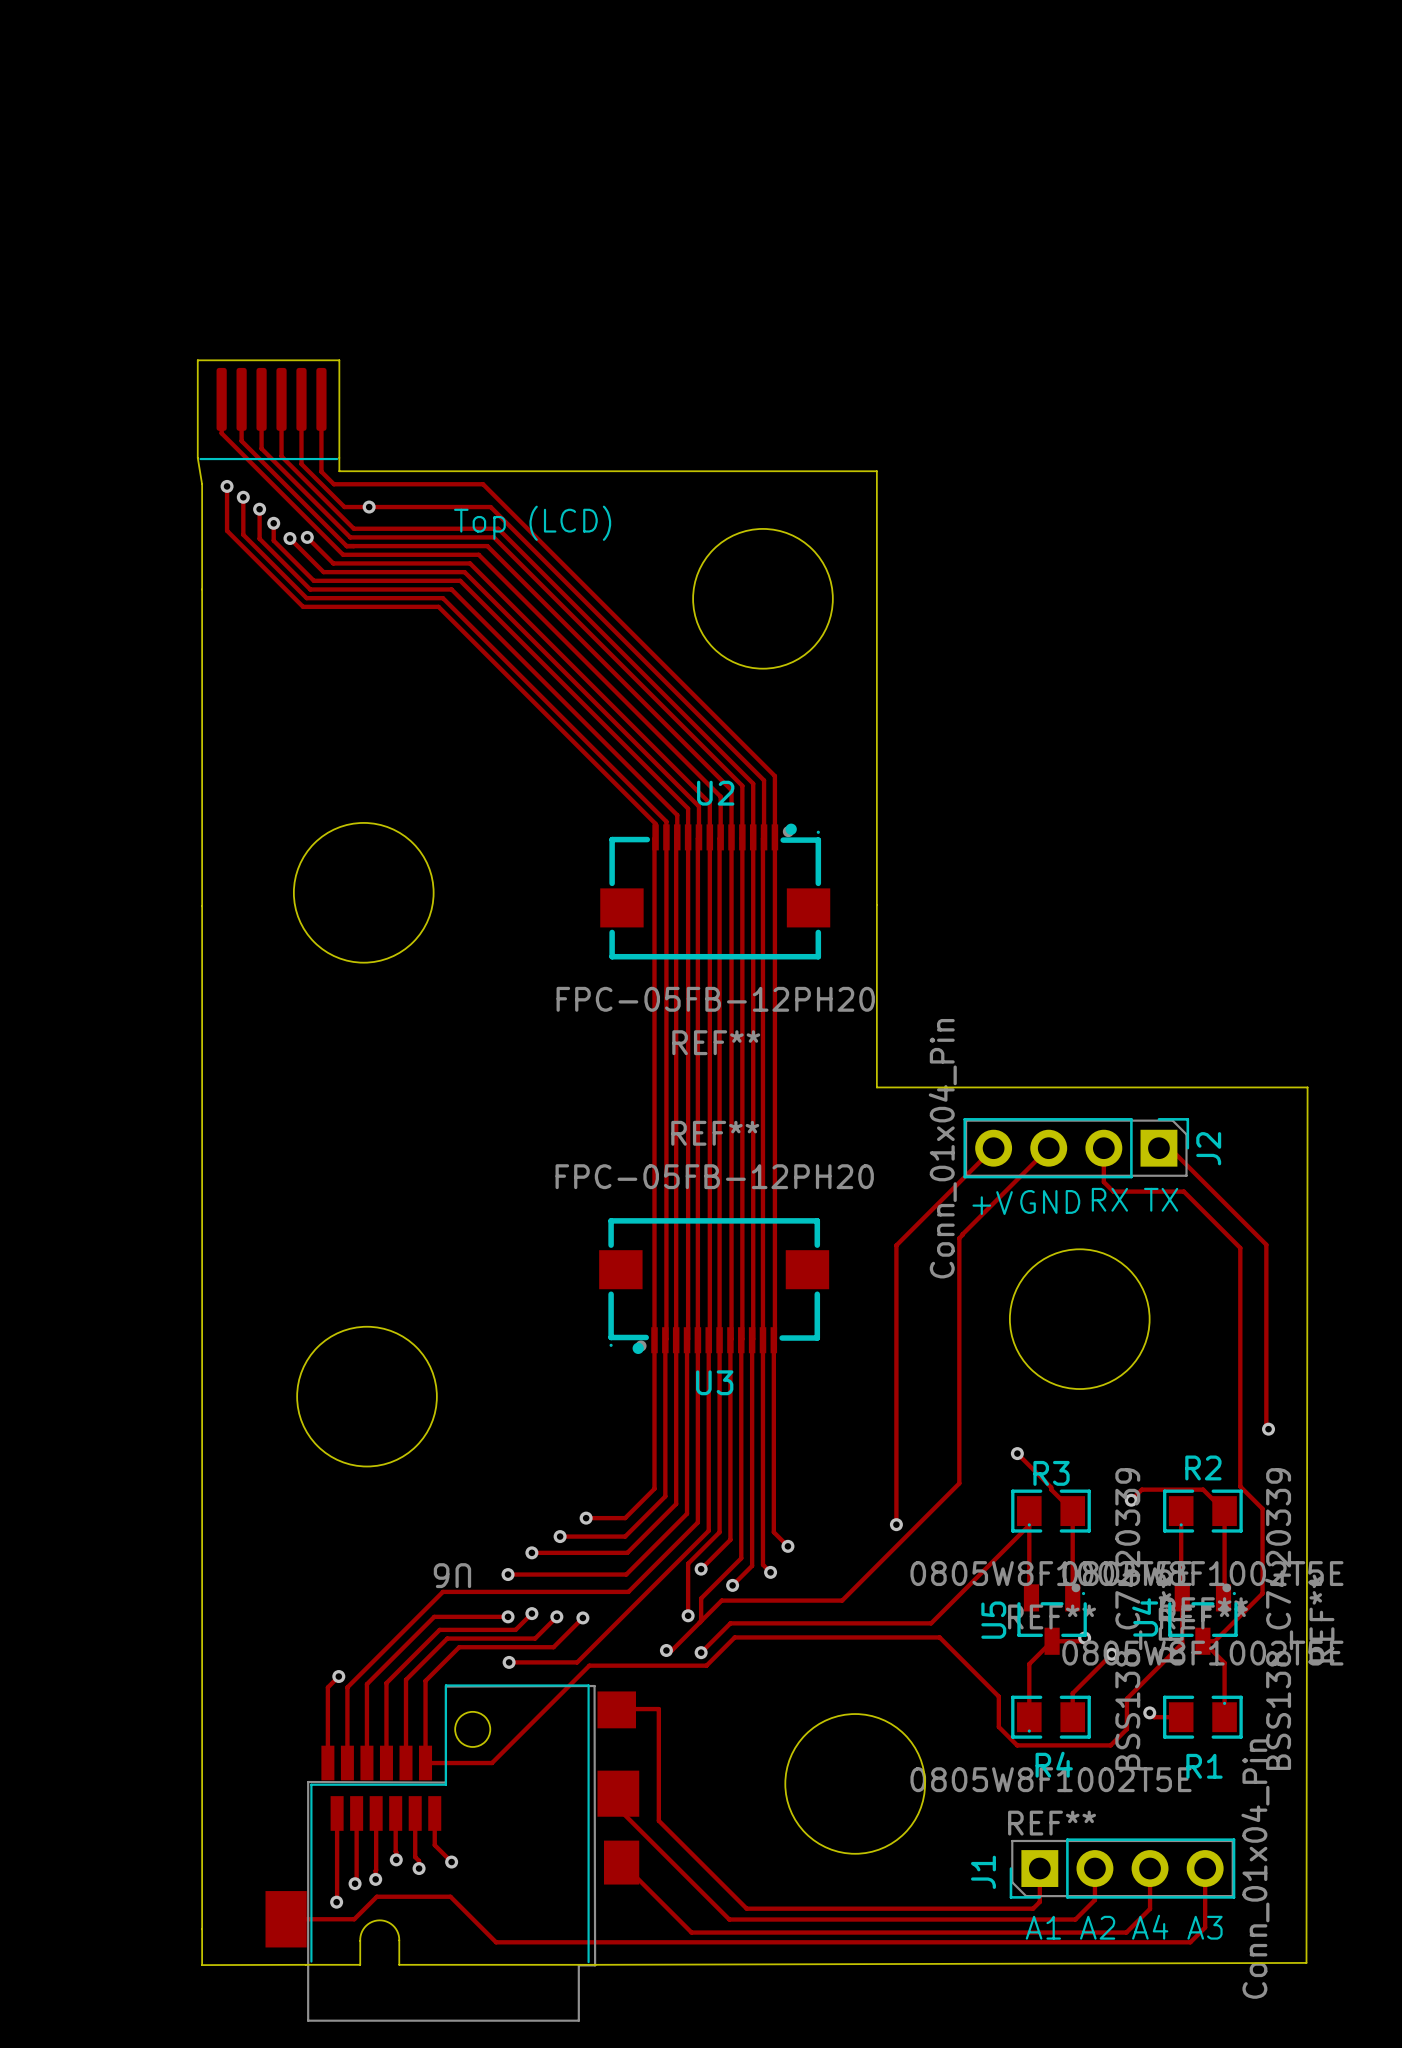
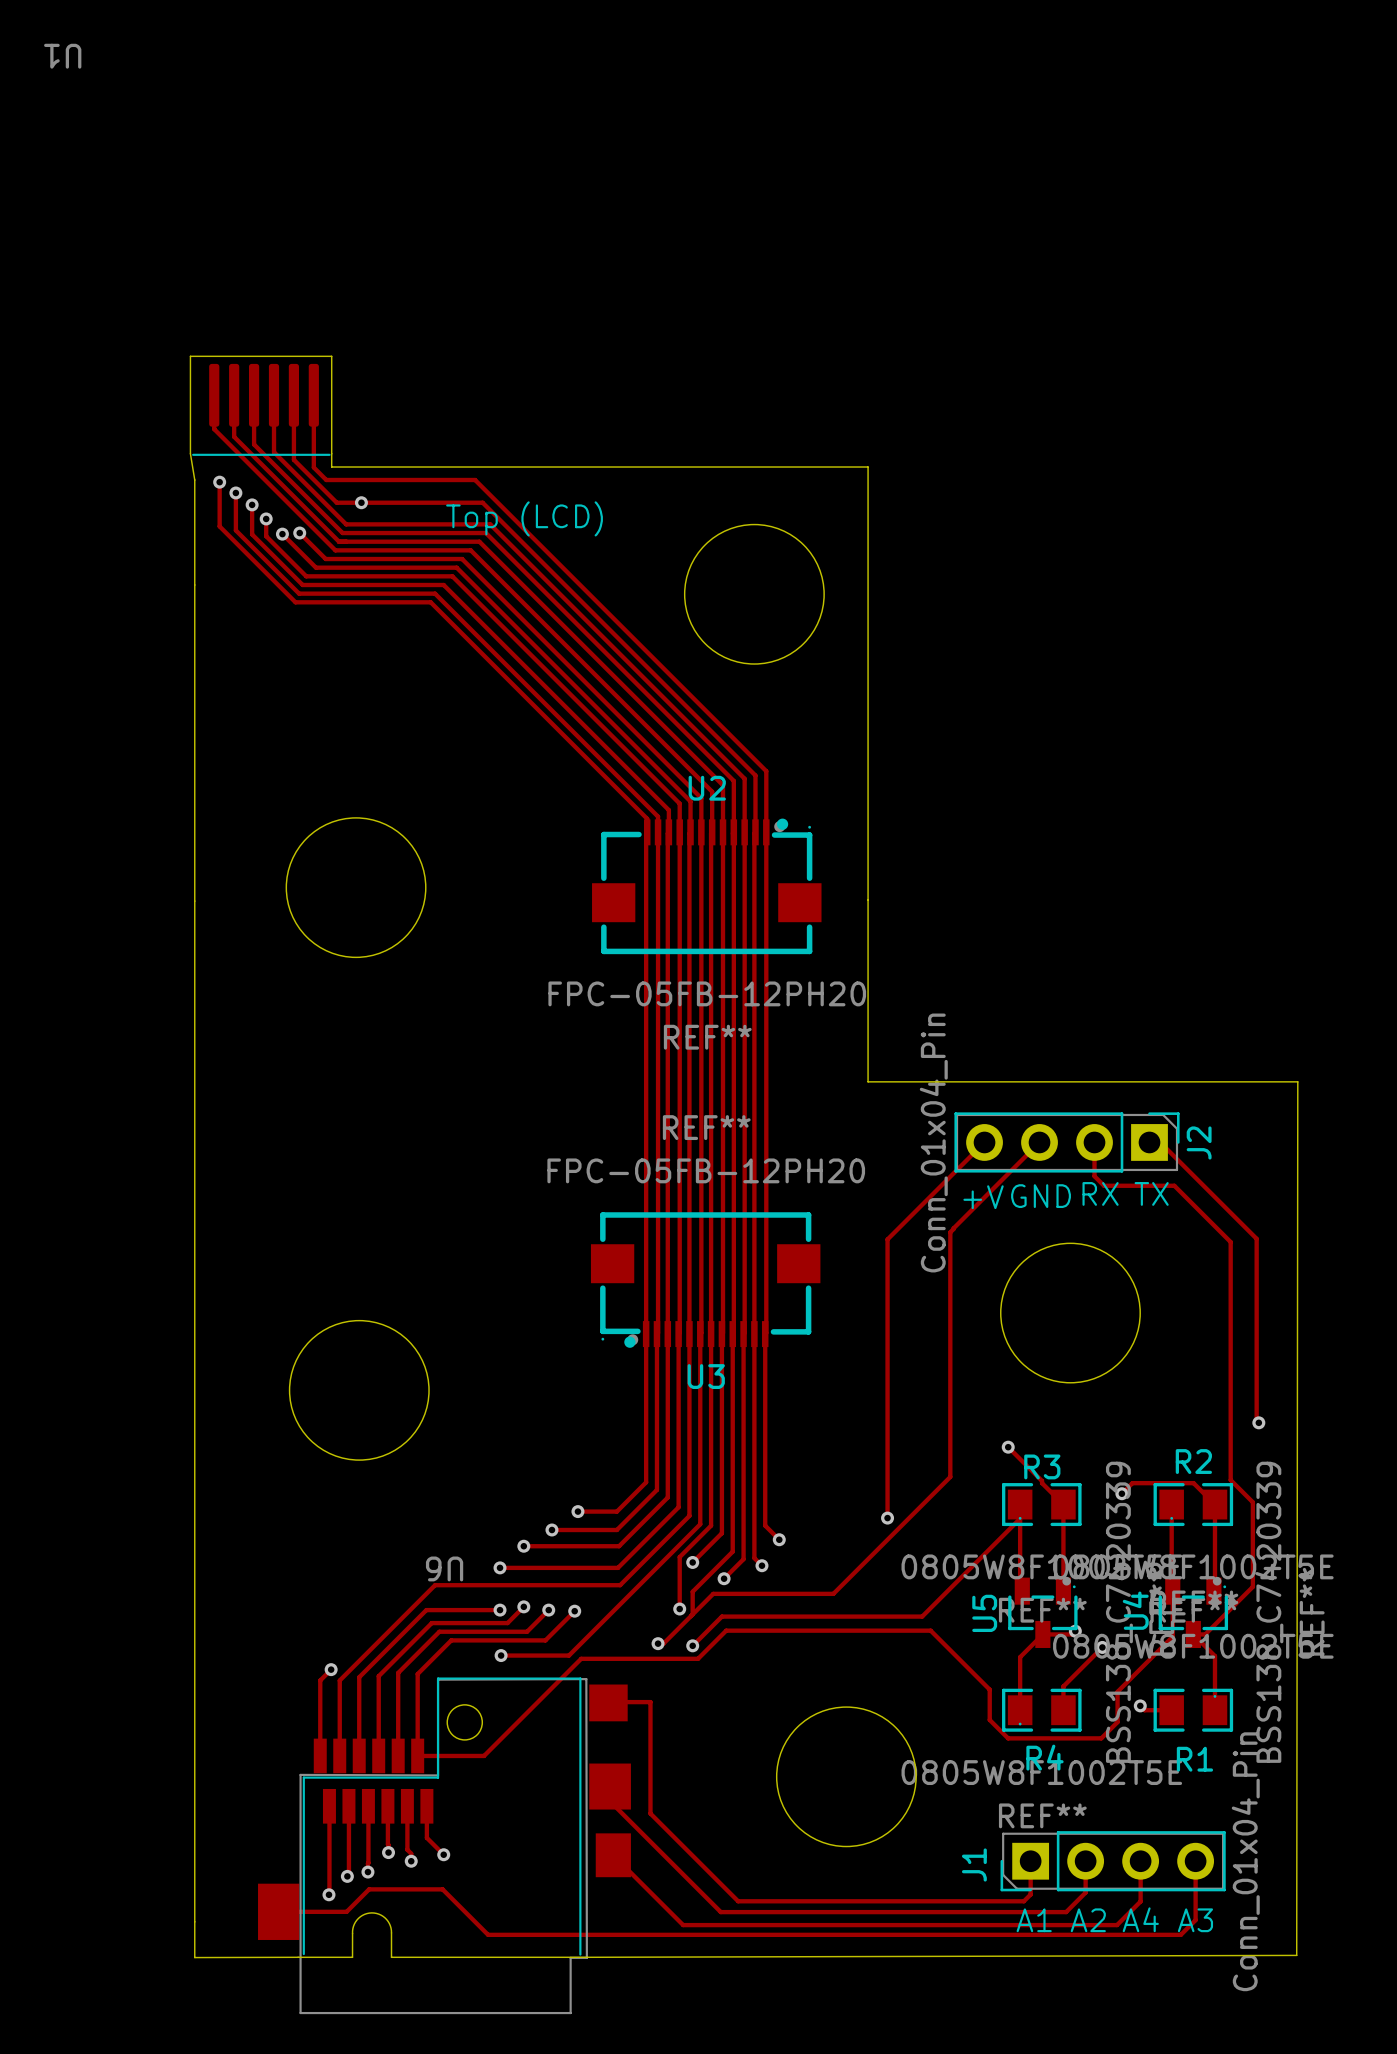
U1 name: none -> U1 (62, 56)

